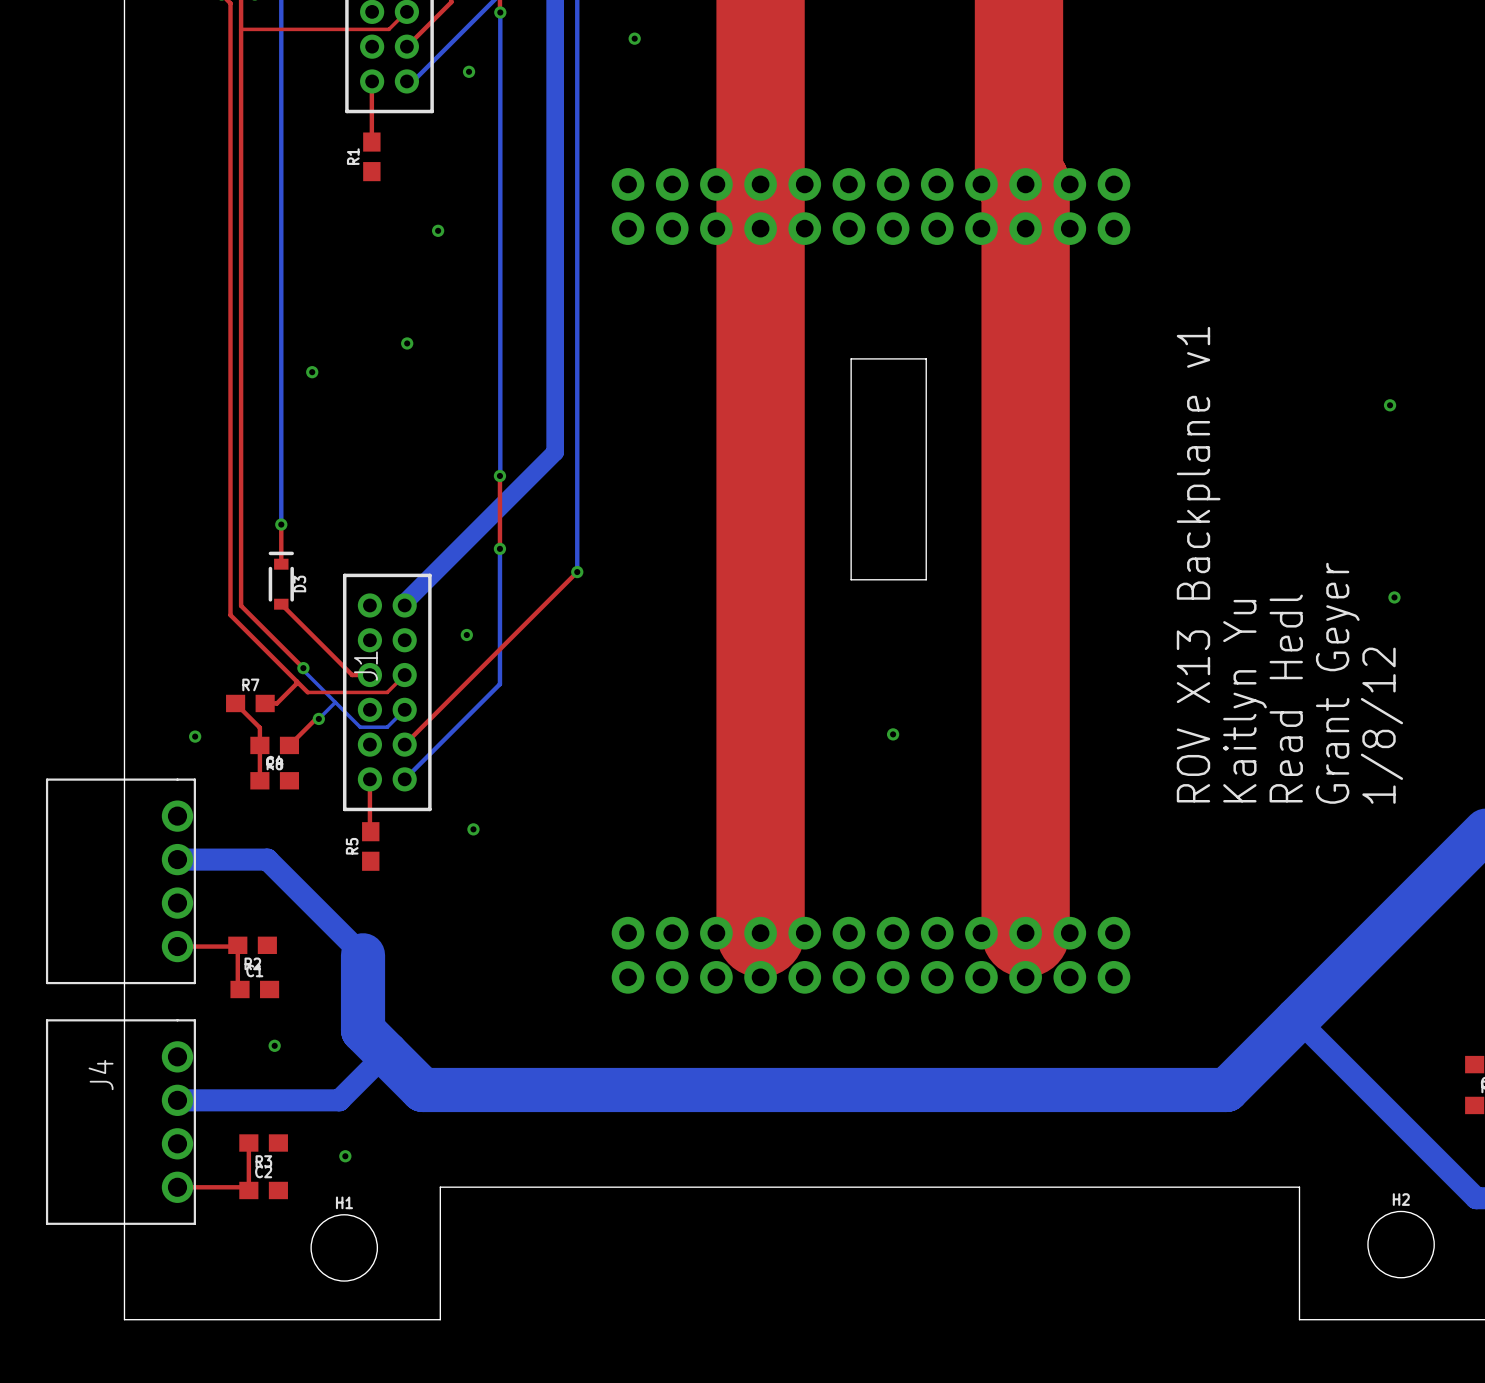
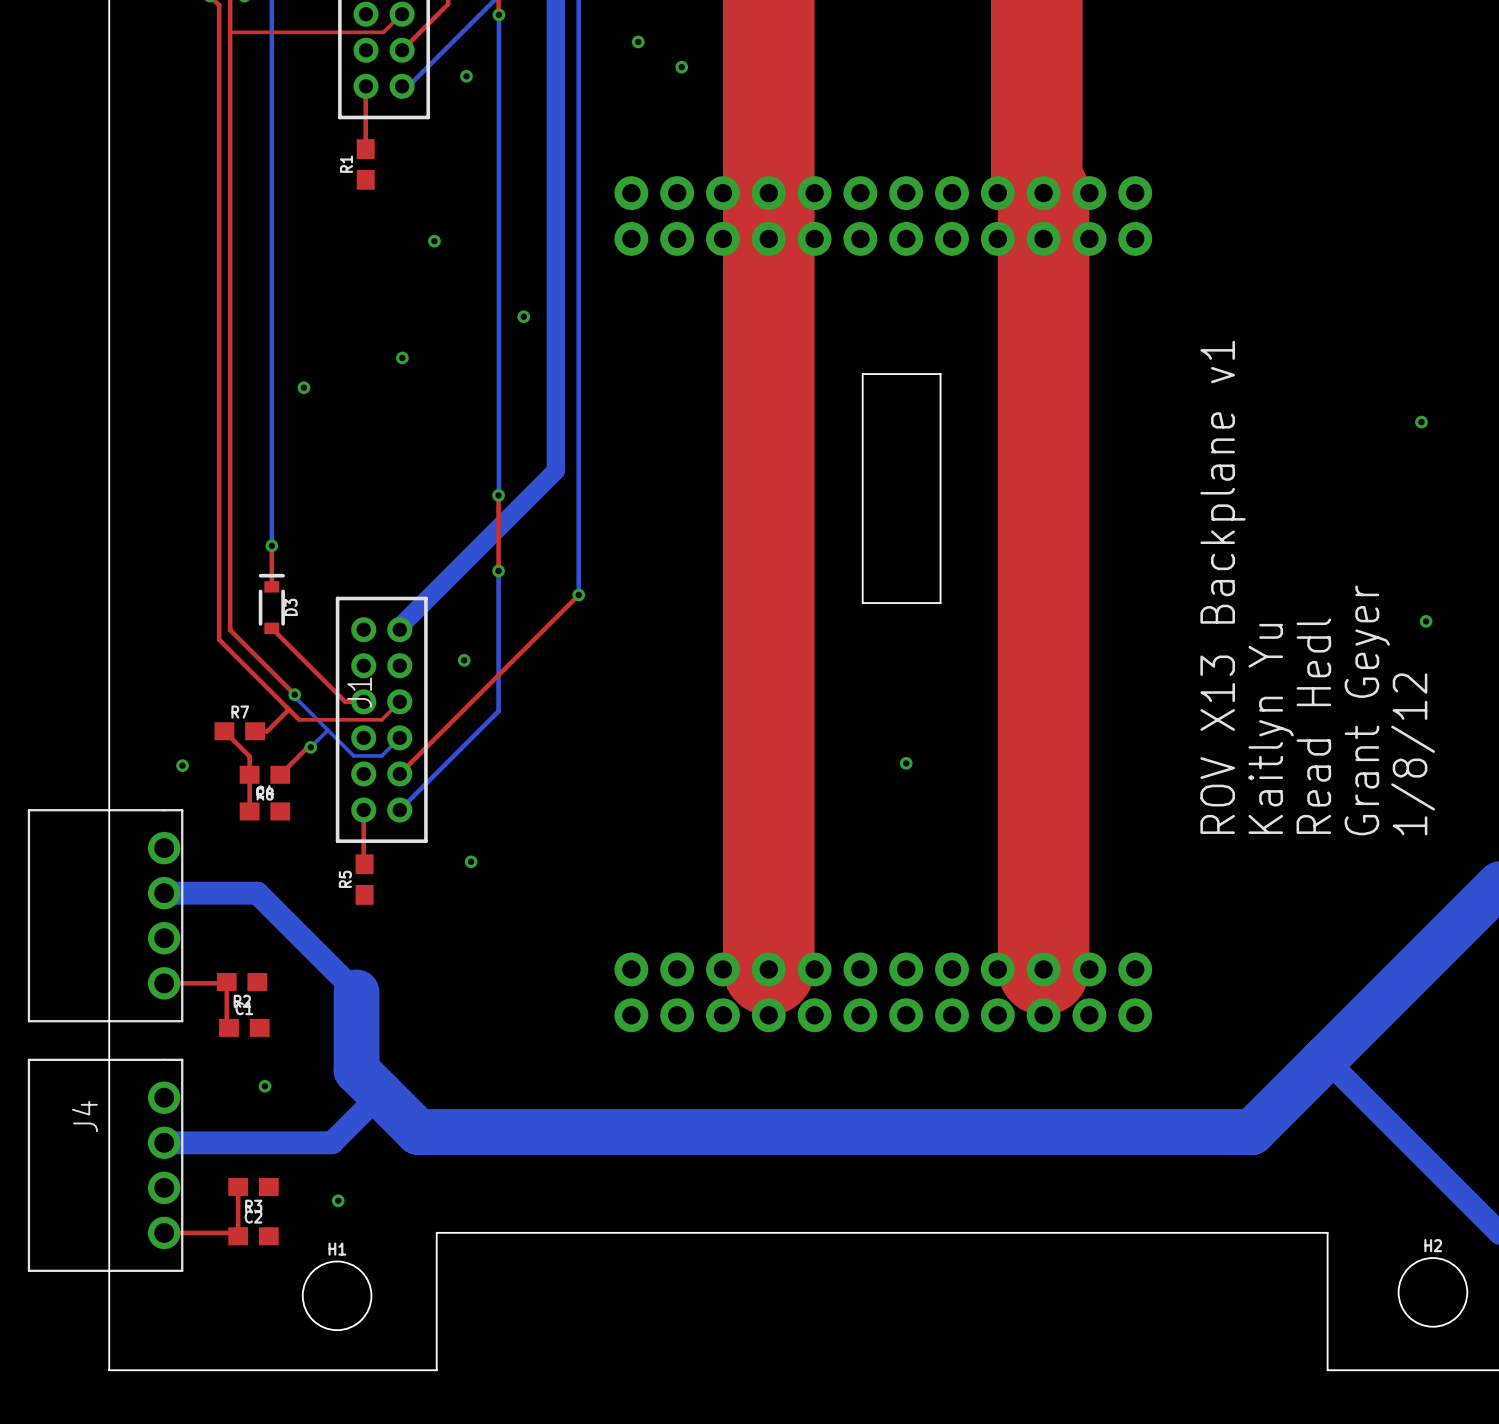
via: none -> (681, 67)
via: none -> (523, 316)

